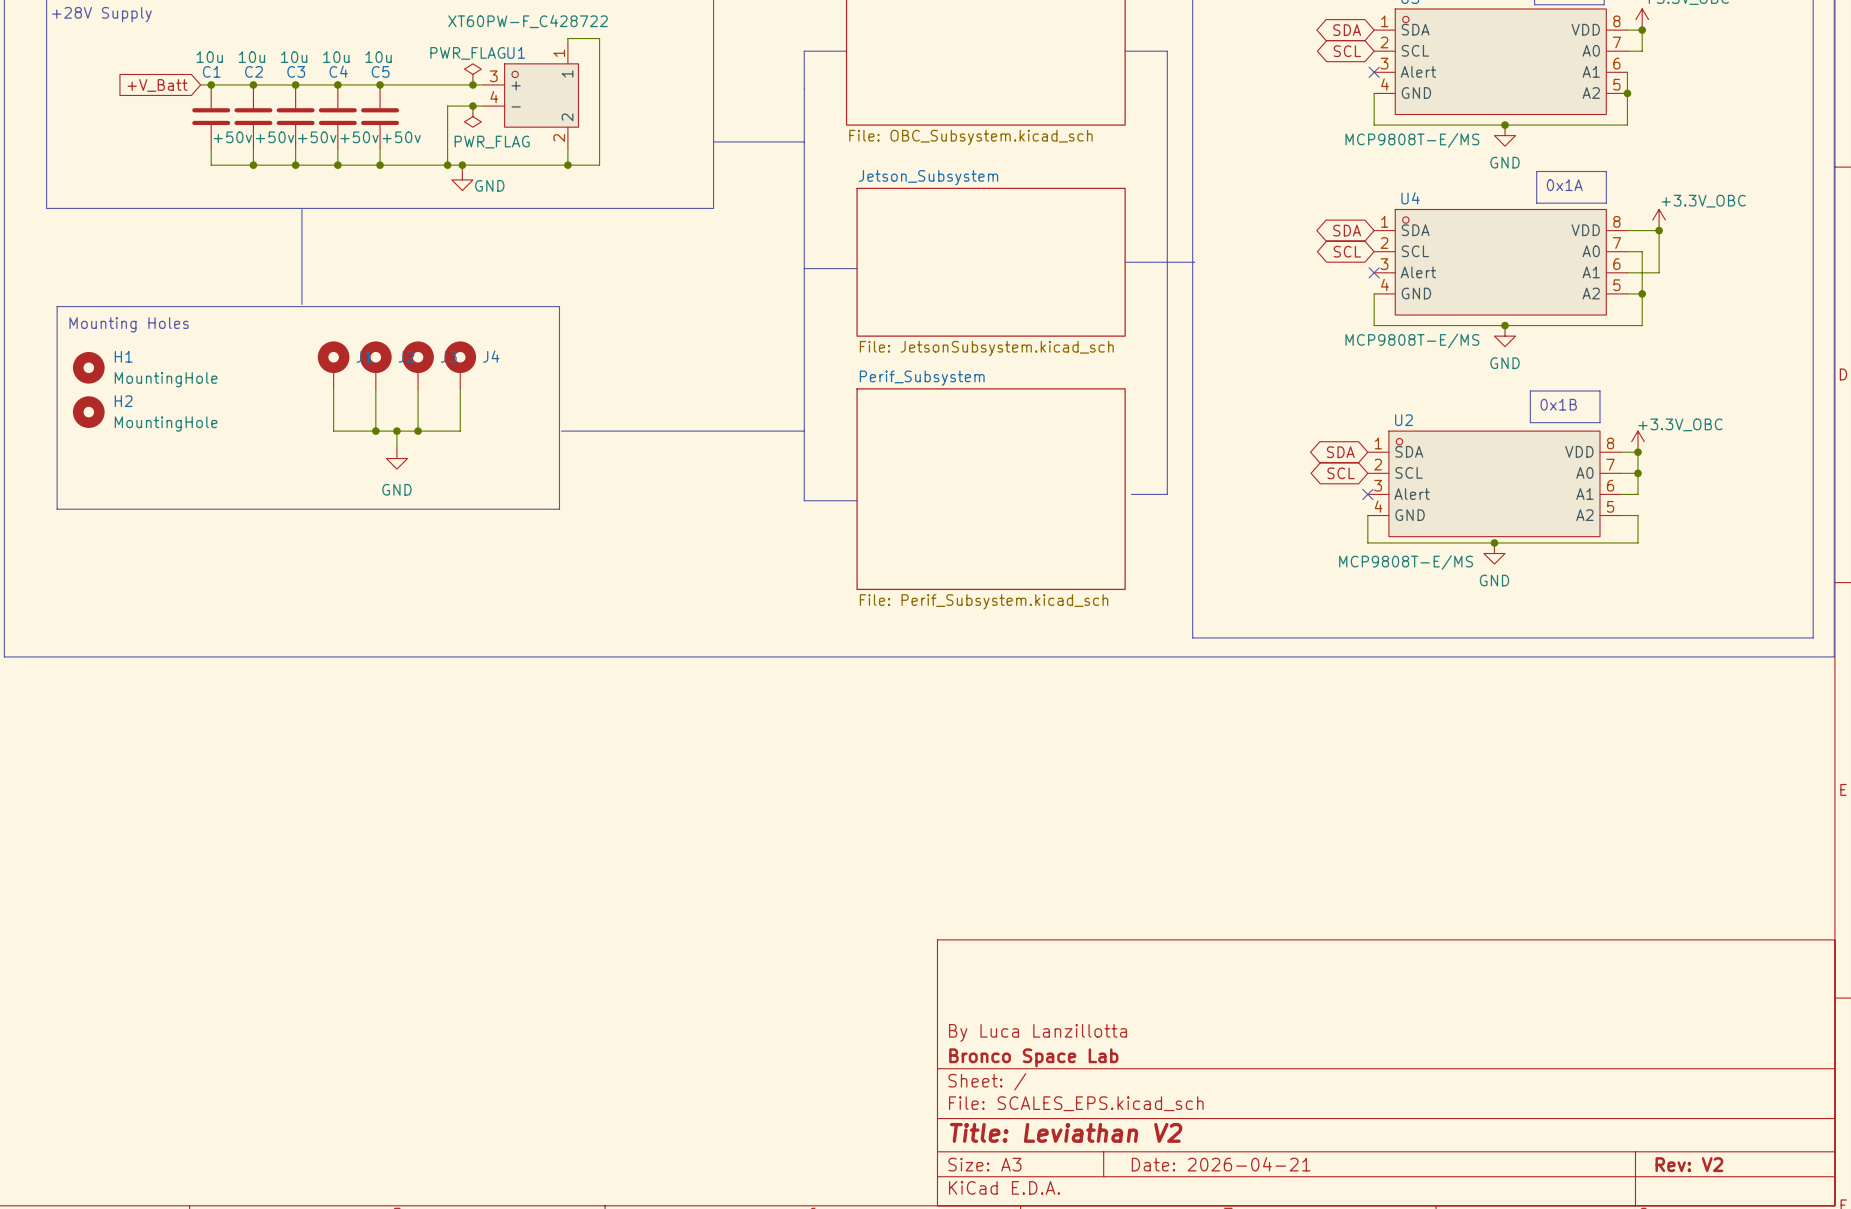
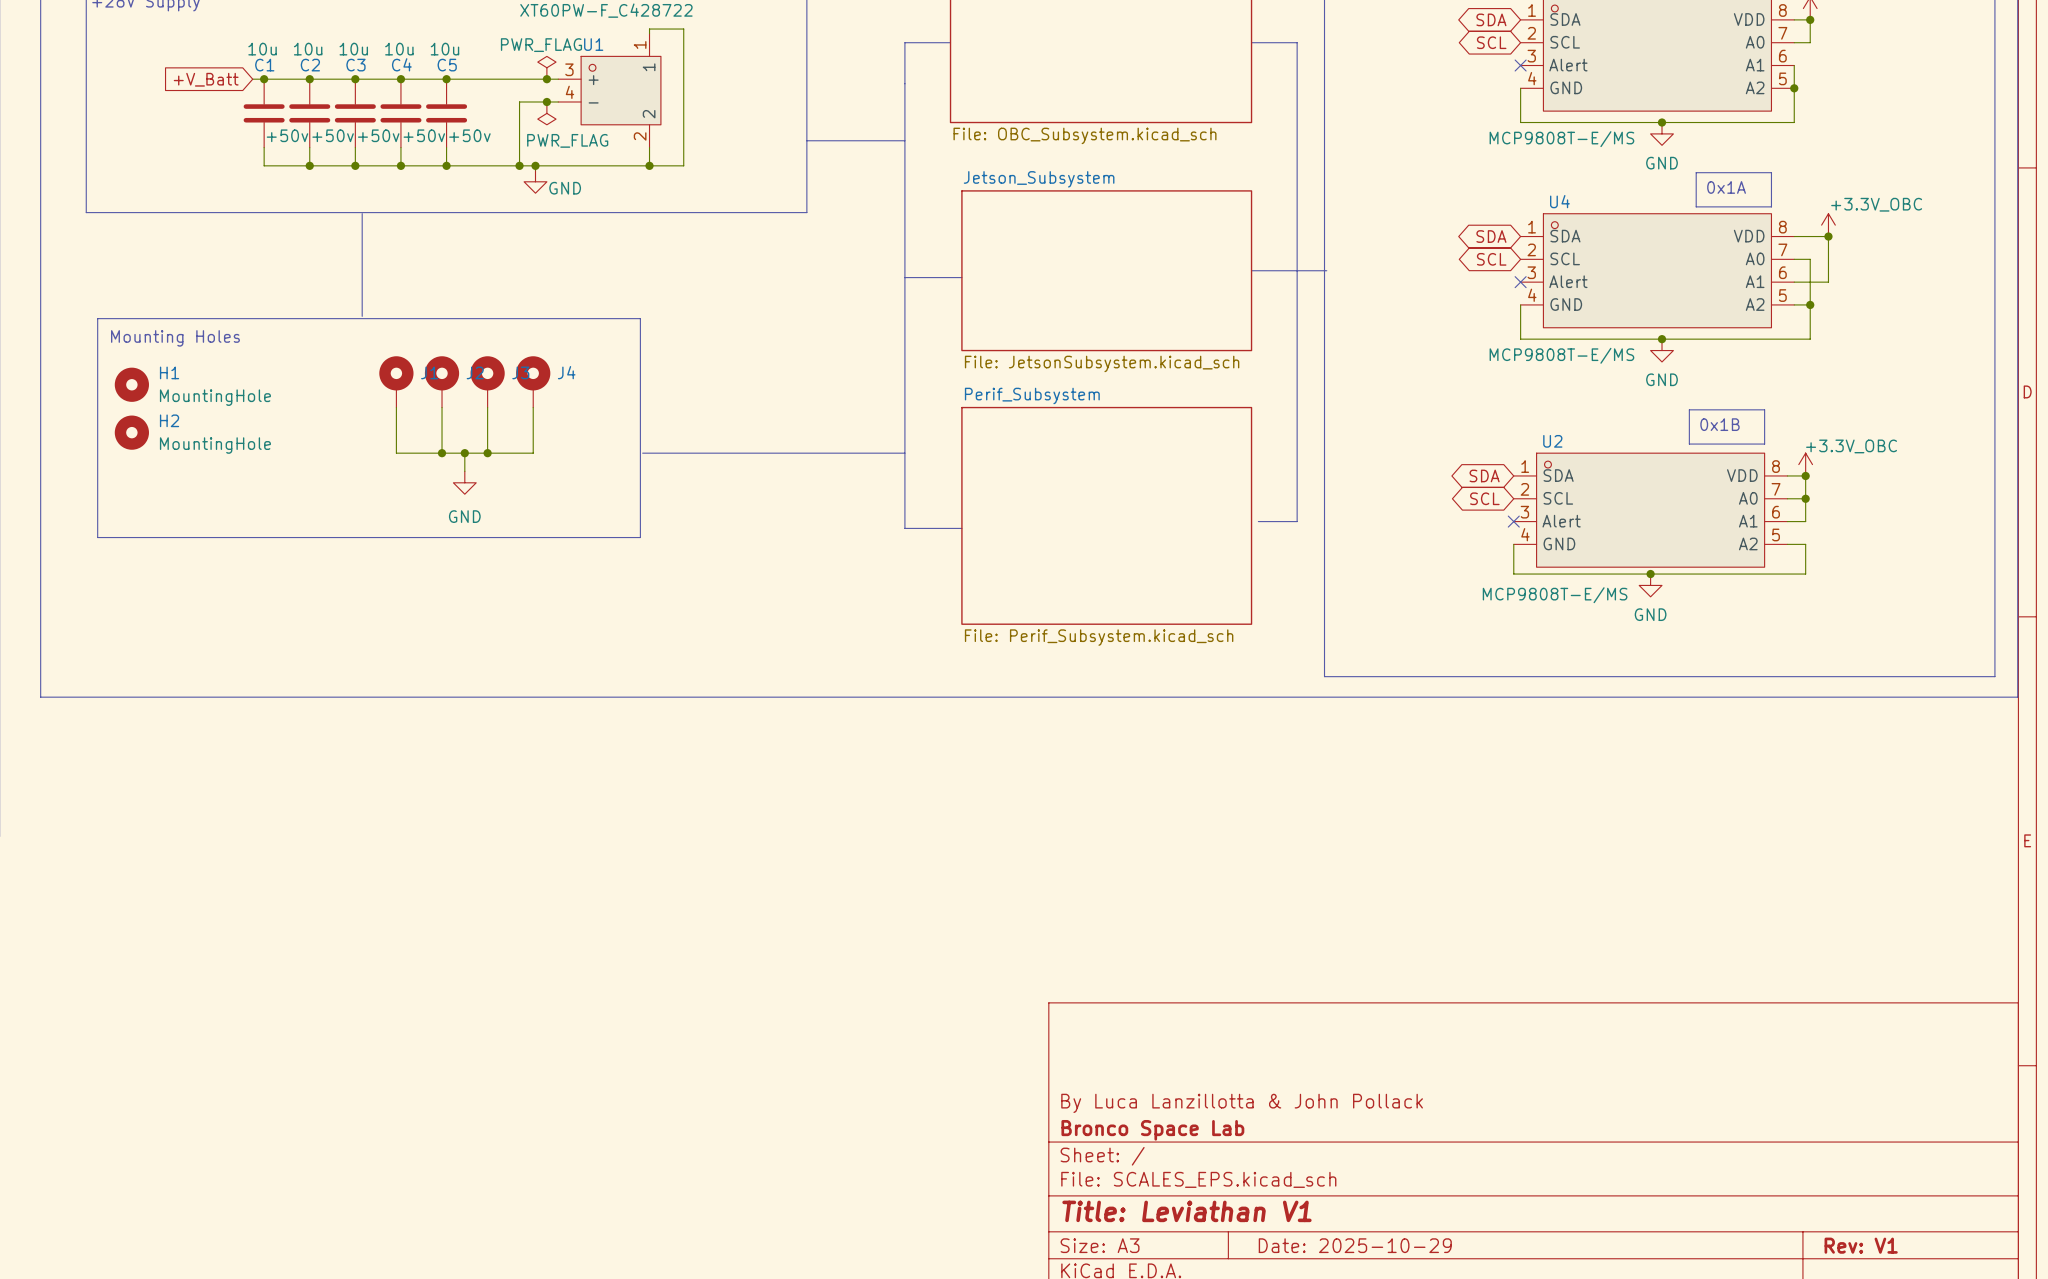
title block: By Luca Lanzillotta (1038, 1032) -> By Luca Lanzillotta & John Pollack (1242, 1103)
title block: Title: Leviathan V2 (1066, 1132) -> Title: Leviathan V1 (1186, 1211)
title block: Date: 2026-04-21 (1221, 1164) -> Date: 2025-10-29 (1355, 1245)
title block: Rev: V2 (1689, 1164) -> Rev: V1 (1861, 1245)

